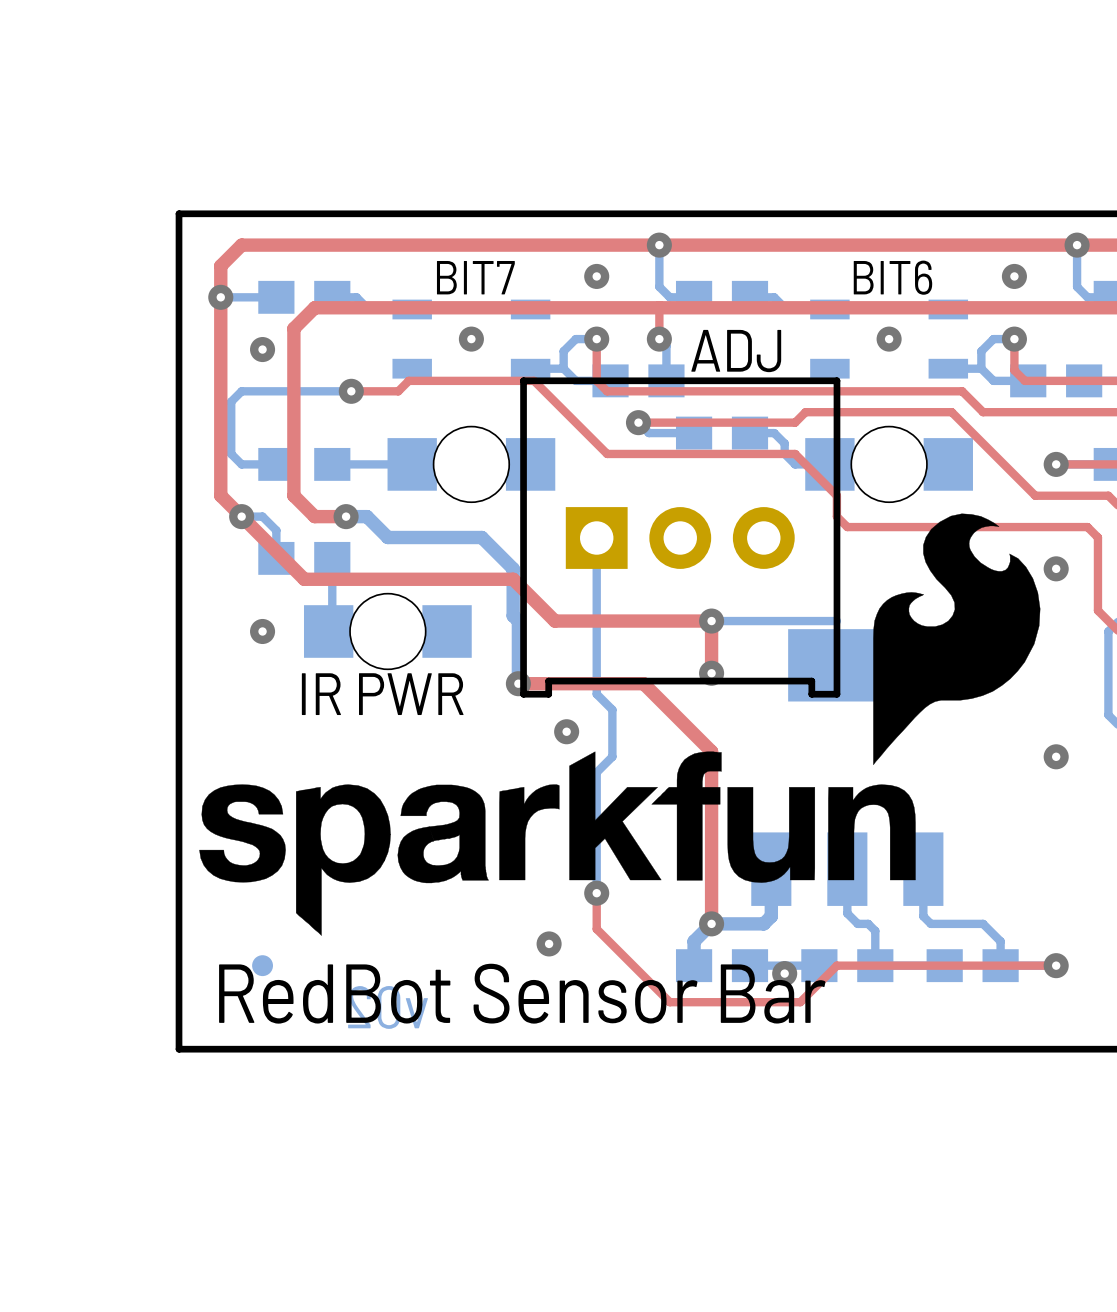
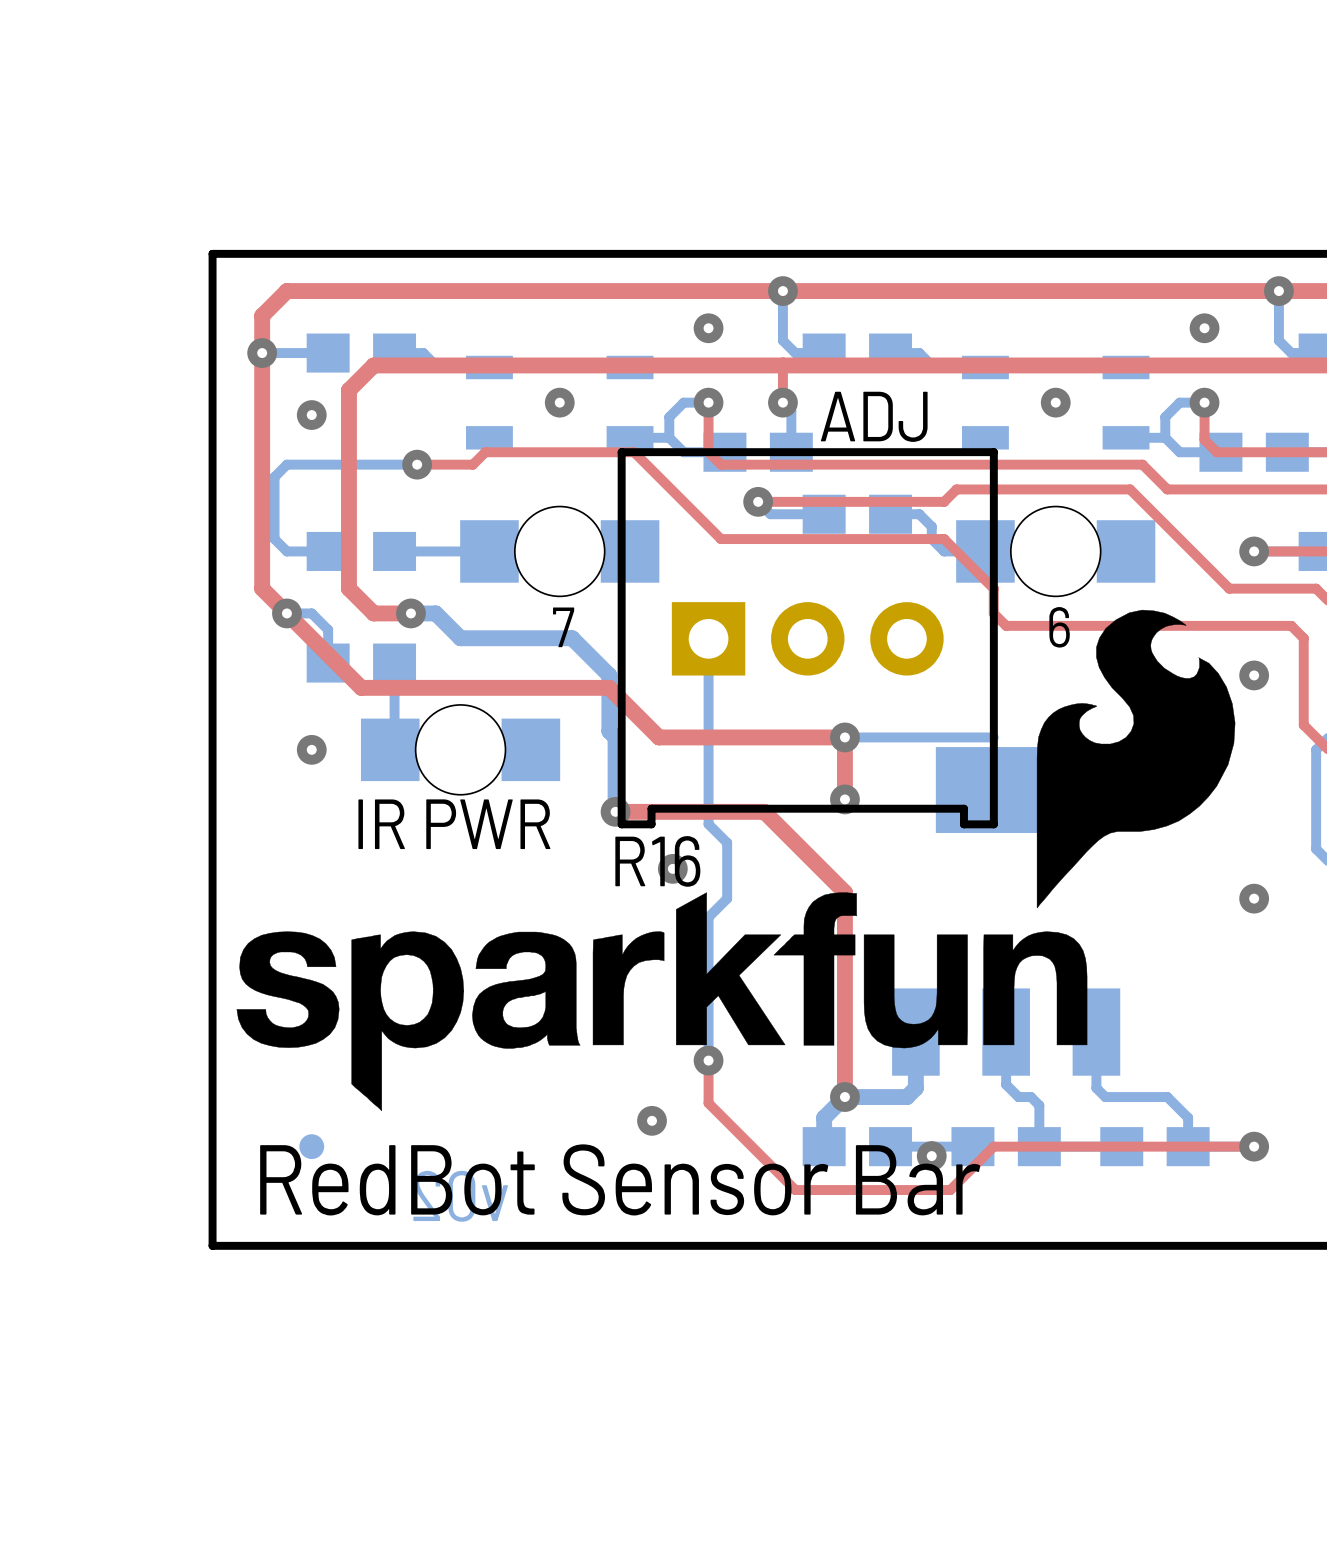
text: BIT7 (475, 277) -> none
text: BIT6 (892, 277) -> none
text: none -> 7 (563, 627)
text: none -> 6 (1059, 627)
R16 name: none -> R16 (657, 861)

